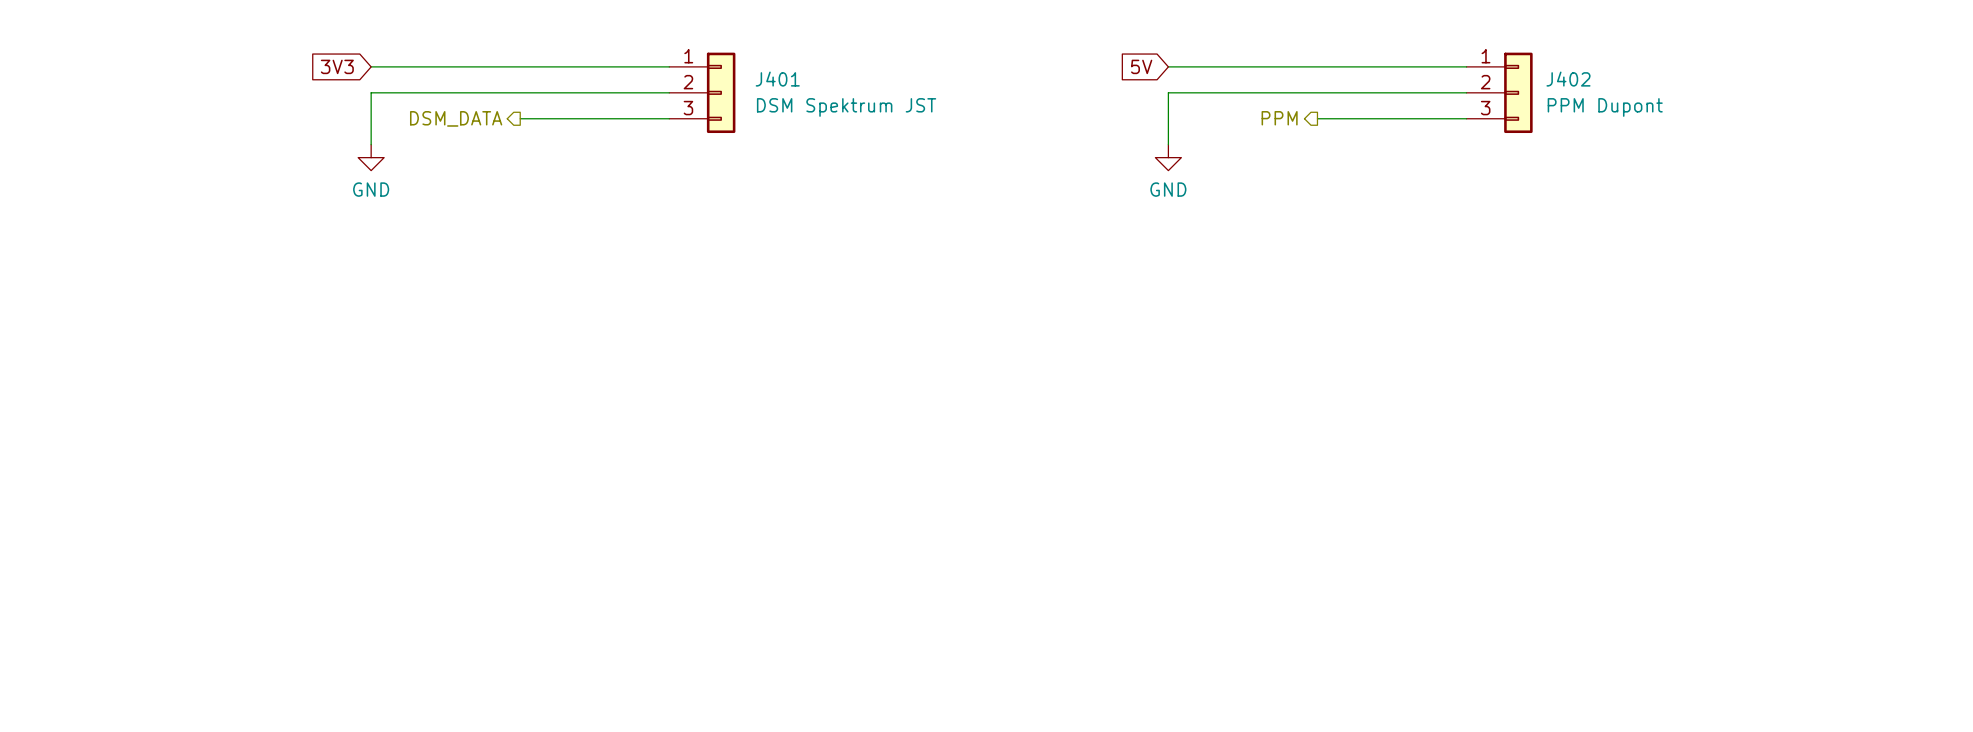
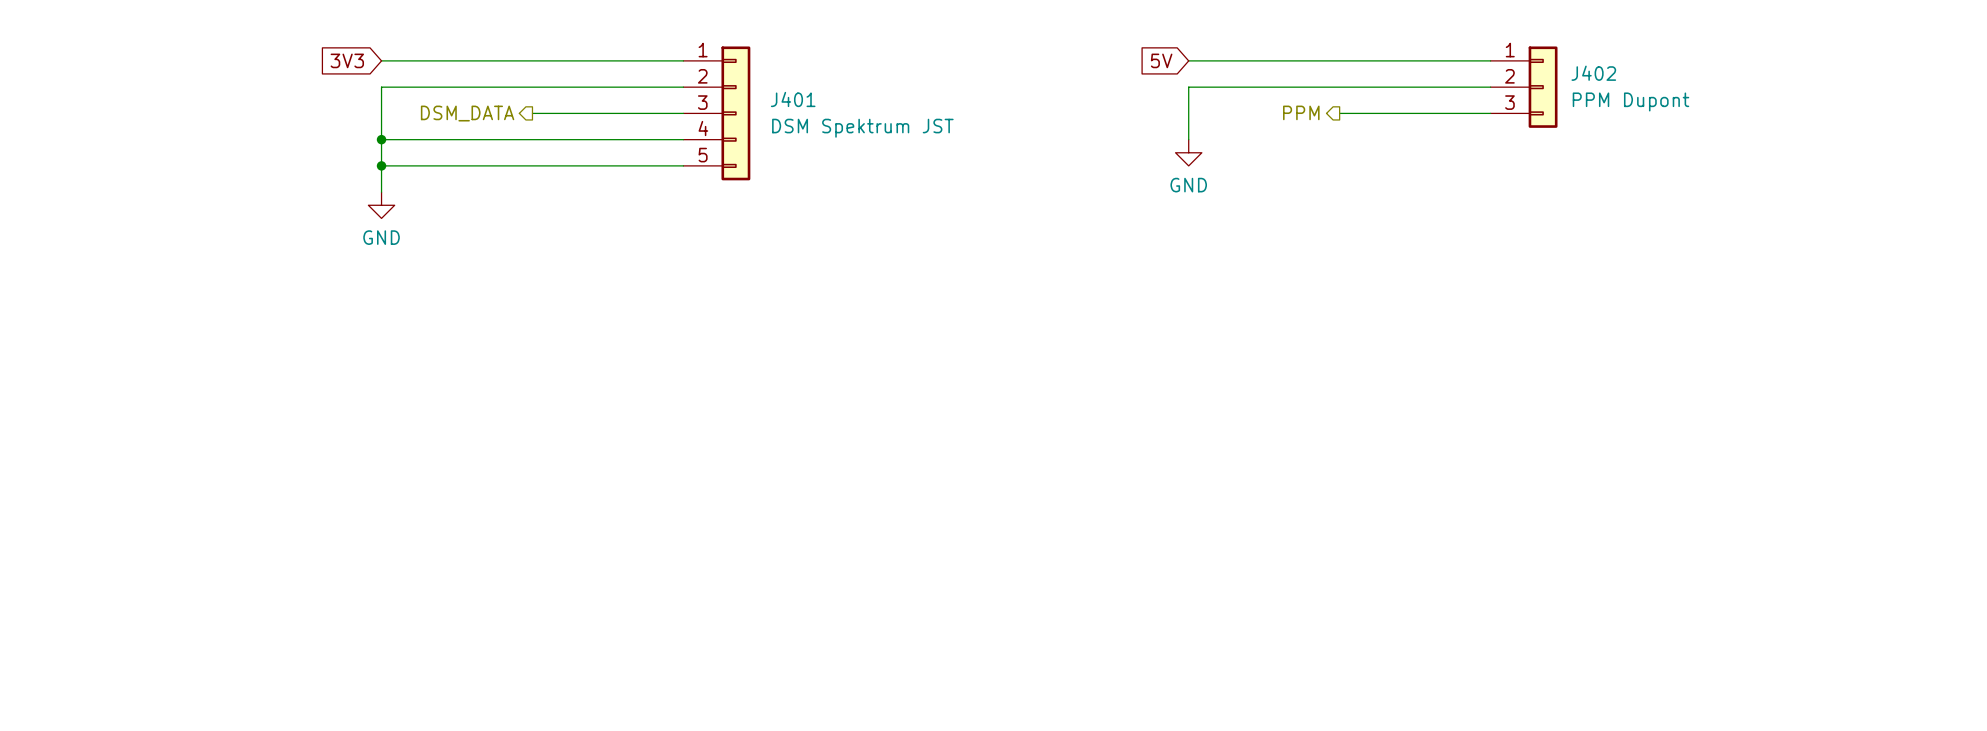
J401 symbol: [669, 52, 736, 134] -> [683, 46, 751, 181]
junction: none -> (381, 139)
wire: none -> (683, 139) (381, 139) (381, 192)
power symbol position: GND (371, 157) -> GND (381, 205)
wire: none -> (381, 165) (683, 165)
junction: none -> (381, 165)

